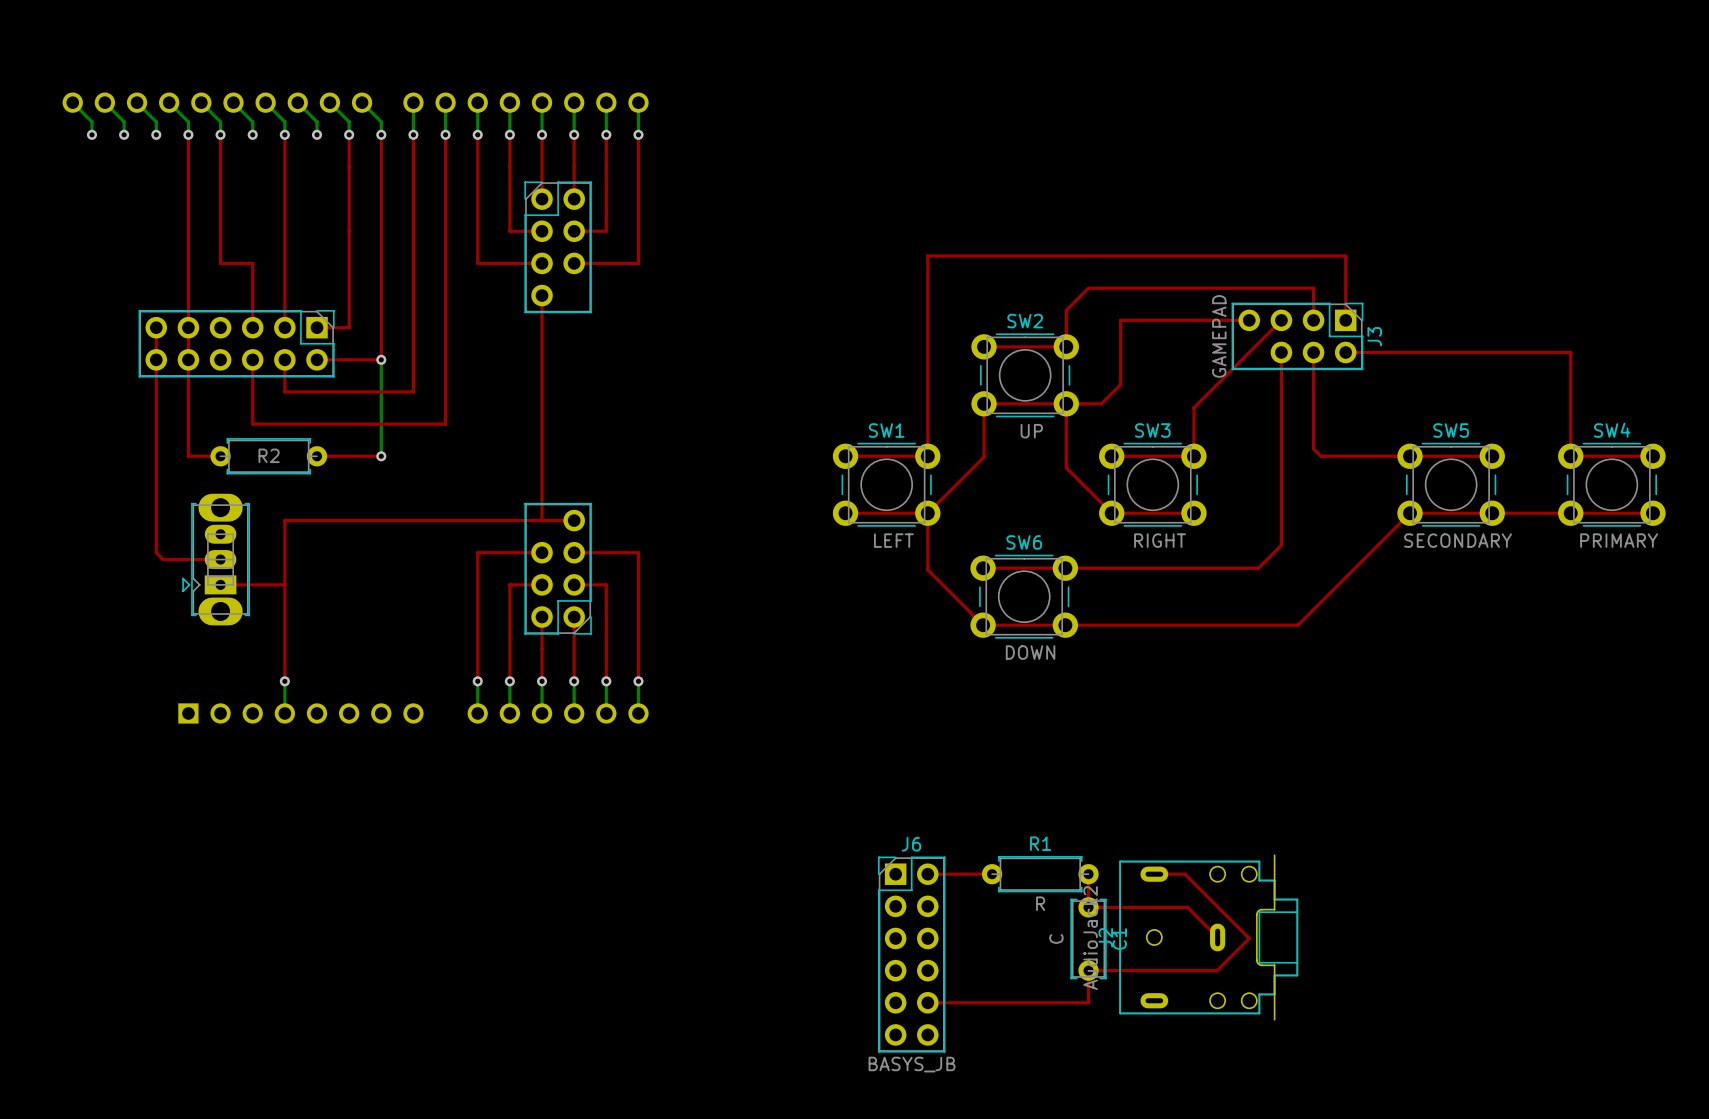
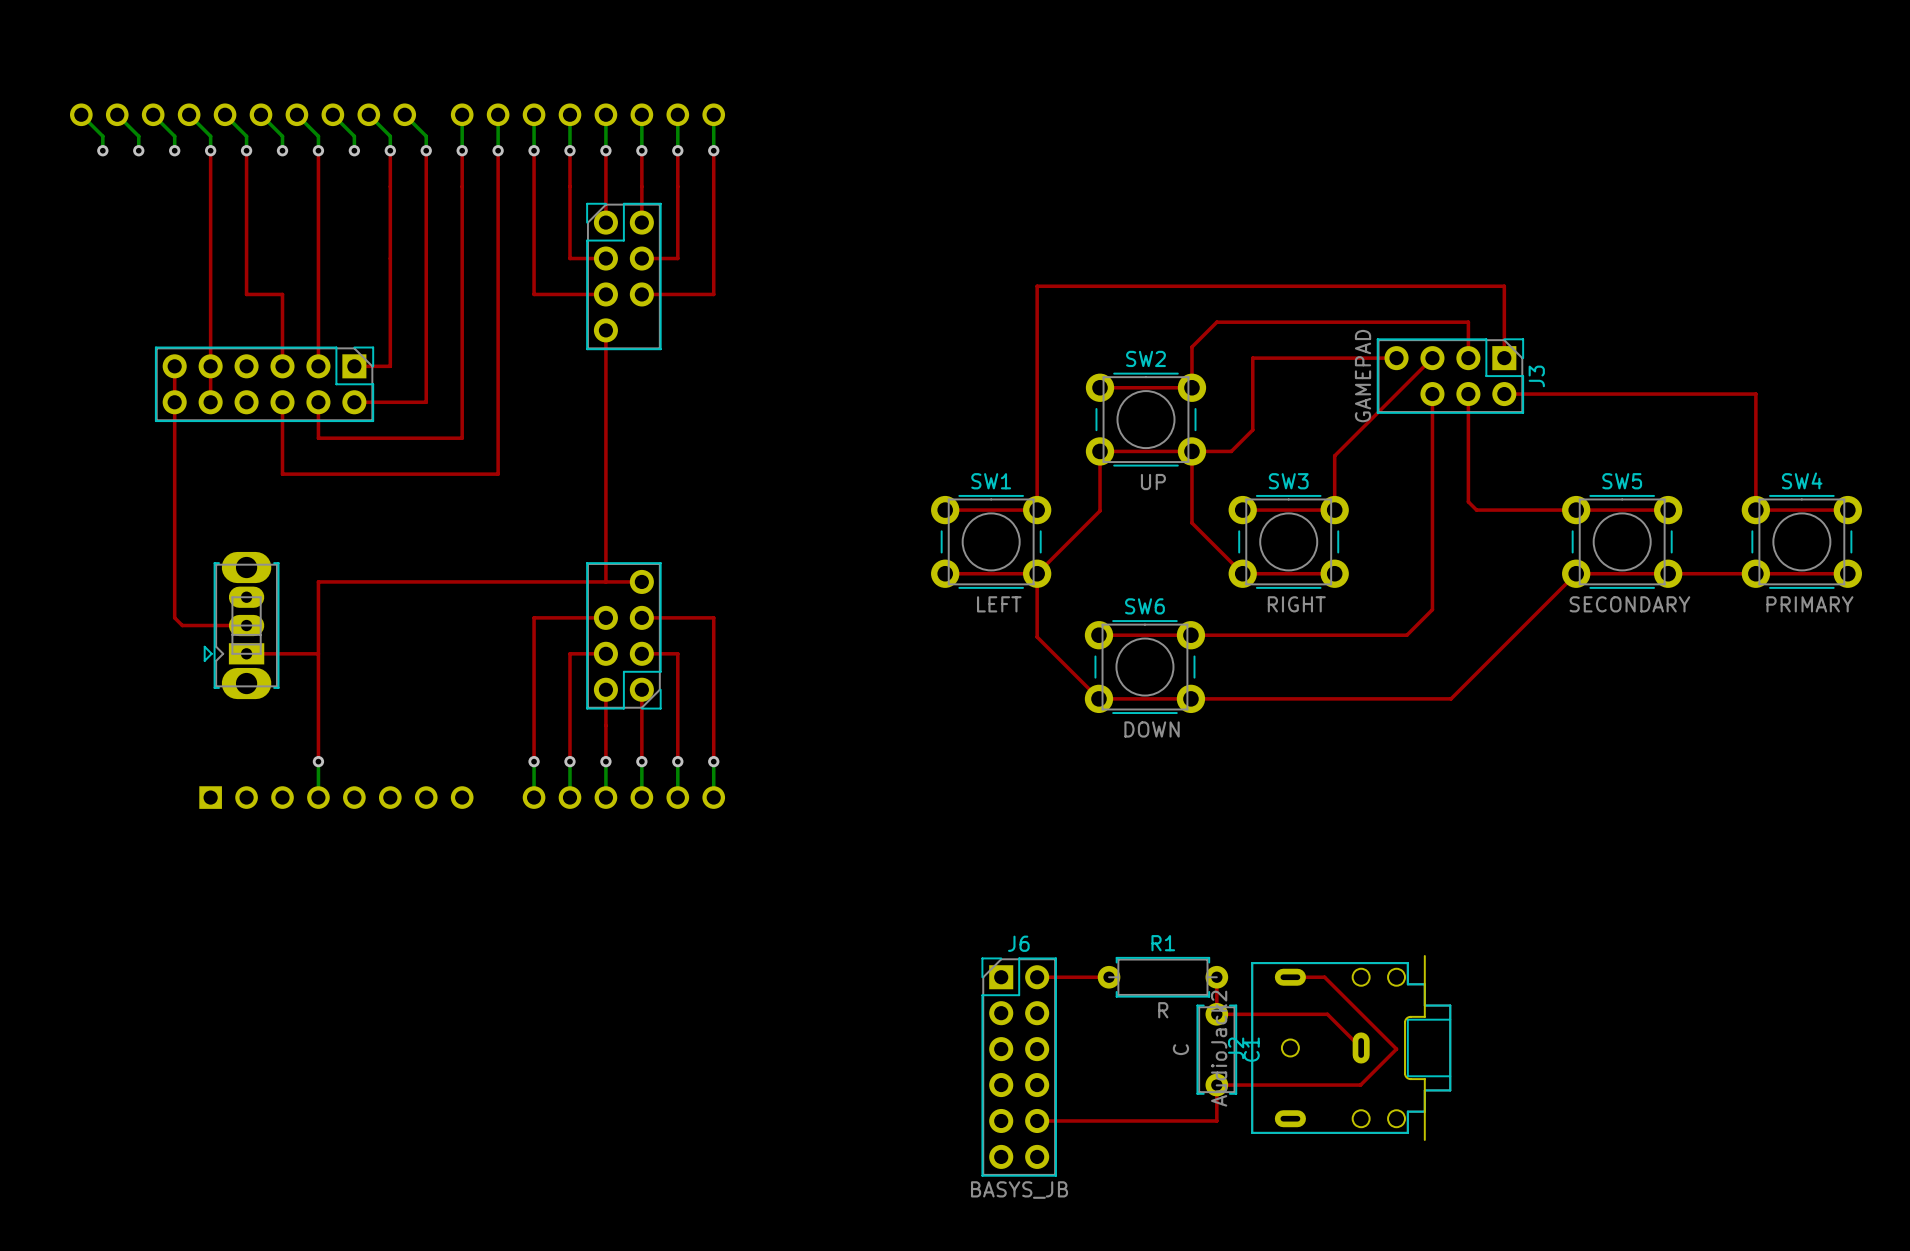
top track: (188, 359) (188, 456) (220, 456) -> none
bottom track: (381, 359) (381, 456) -> none
via: (381, 359) -> none
R2: (268, 456) -> none
top track: (317, 456) (381, 456) -> none
via: (381, 456) -> none

